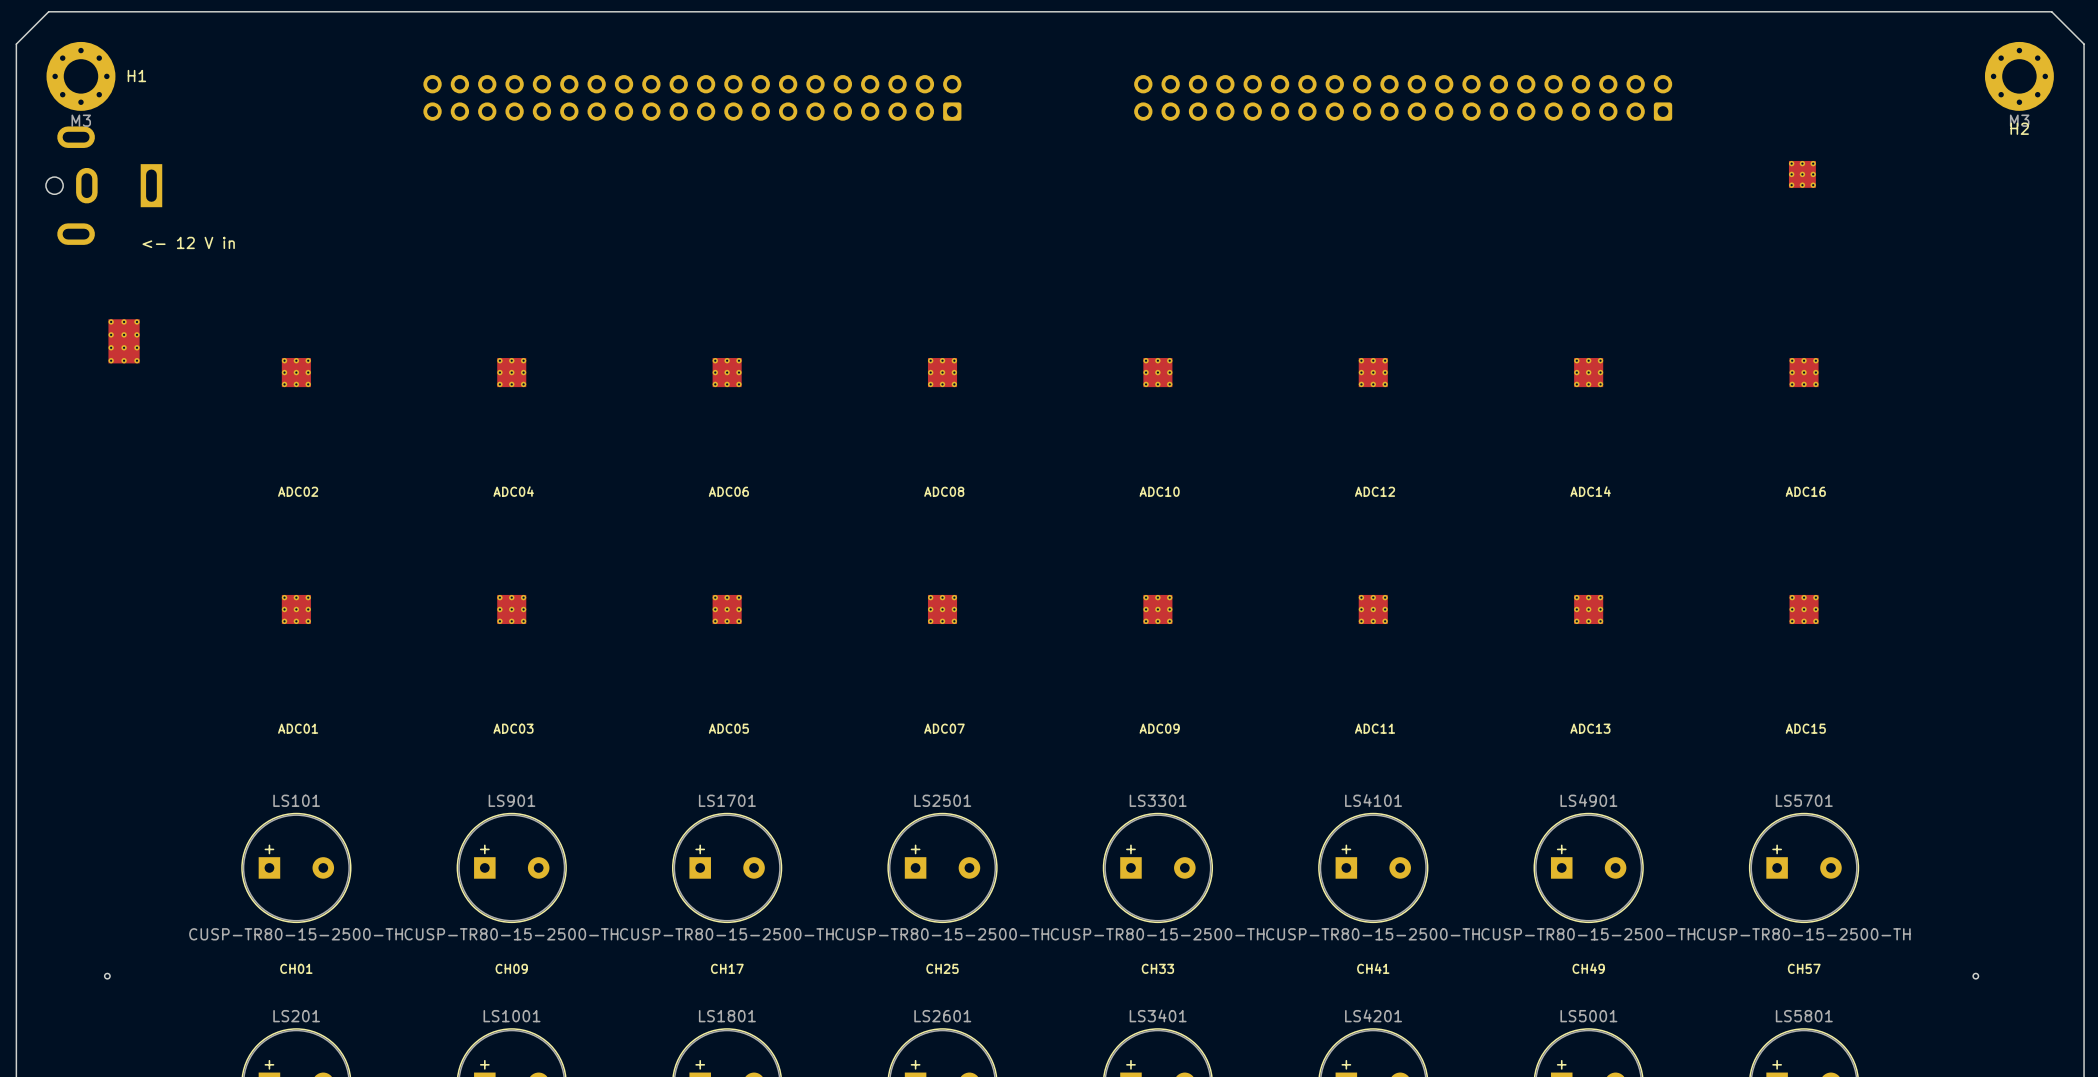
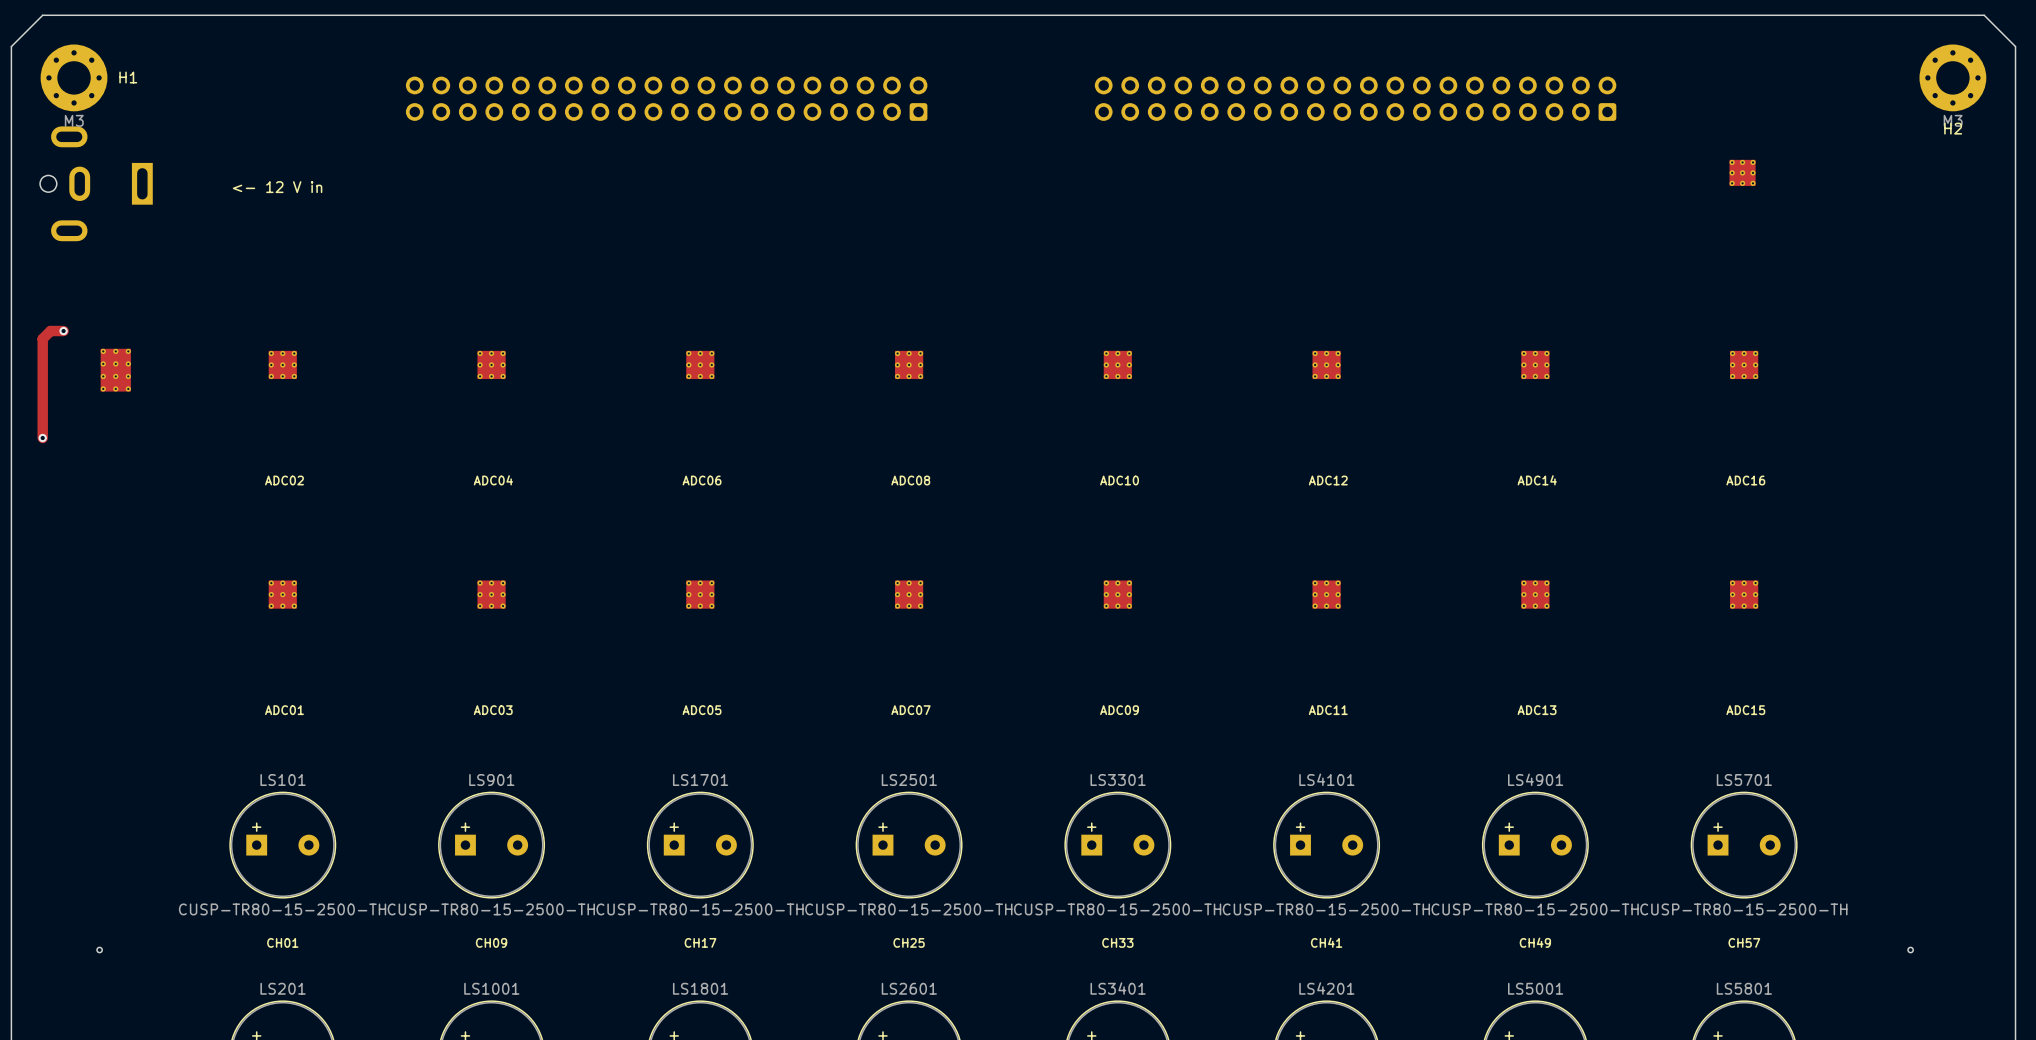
text position: <- 12 V in (188, 242) -> <- 12 V in (277, 187)
track: none -> (63, 331) (50, 331) (42, 338) (42, 438)
via: none -> (63, 331)
part position: (124, 341) -> (115, 370)
via: none -> (42, 438)

